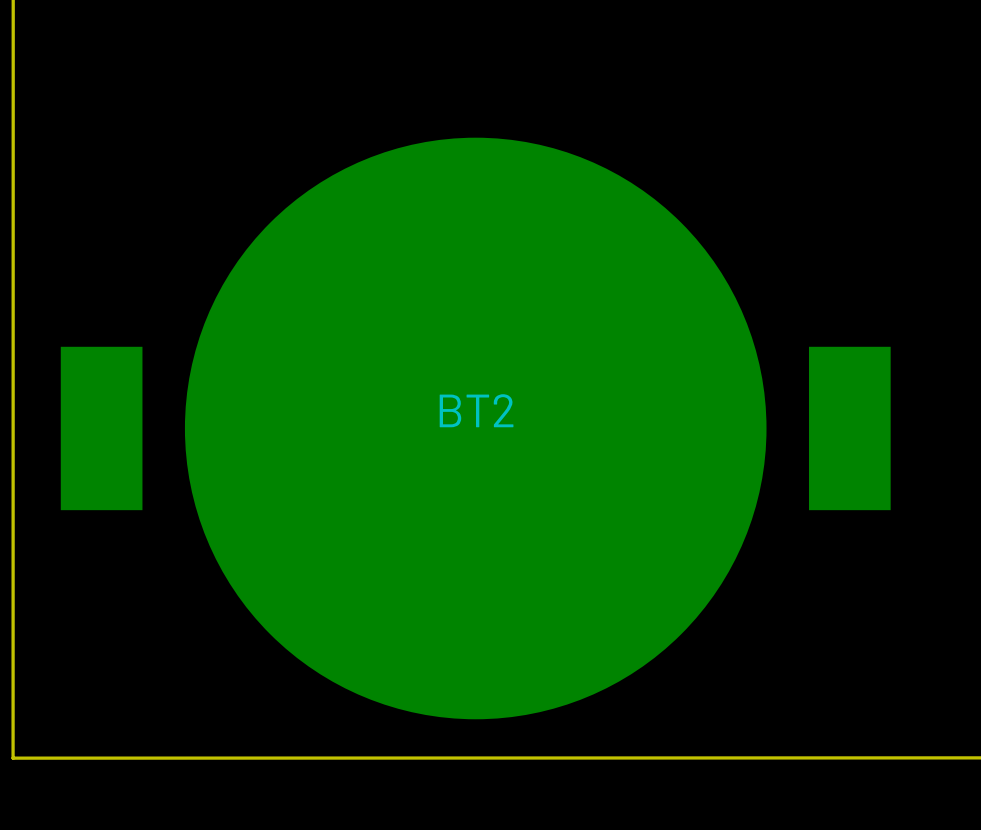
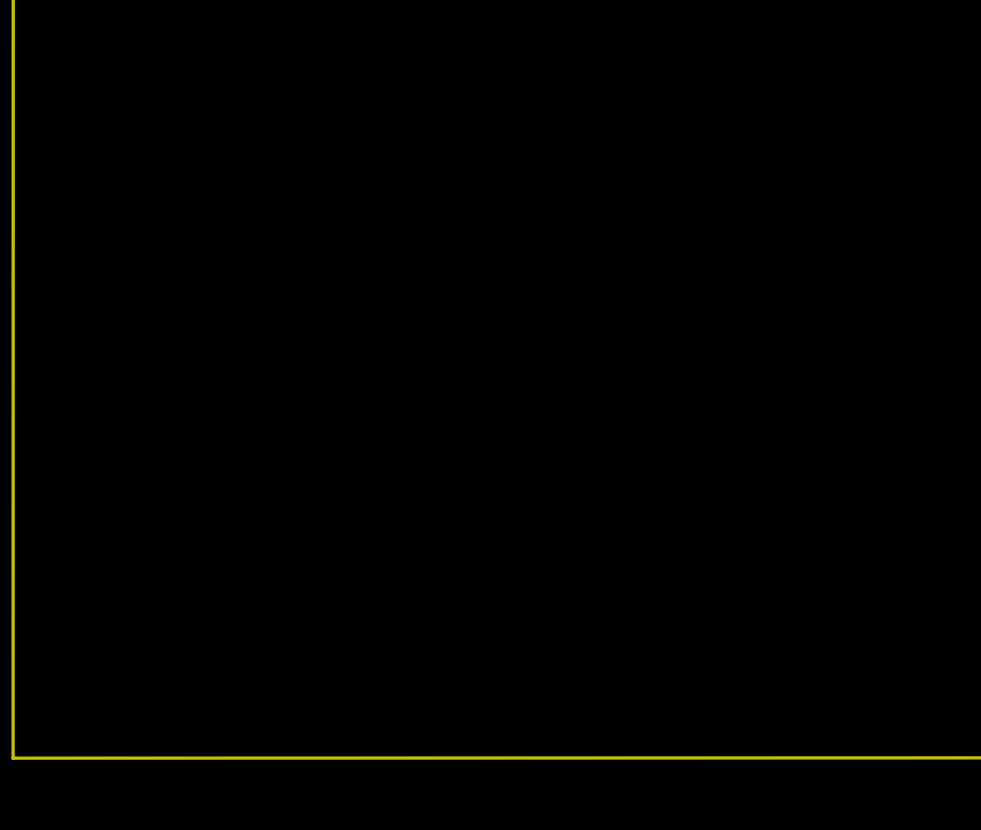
BT2: (475, 428) -> none

